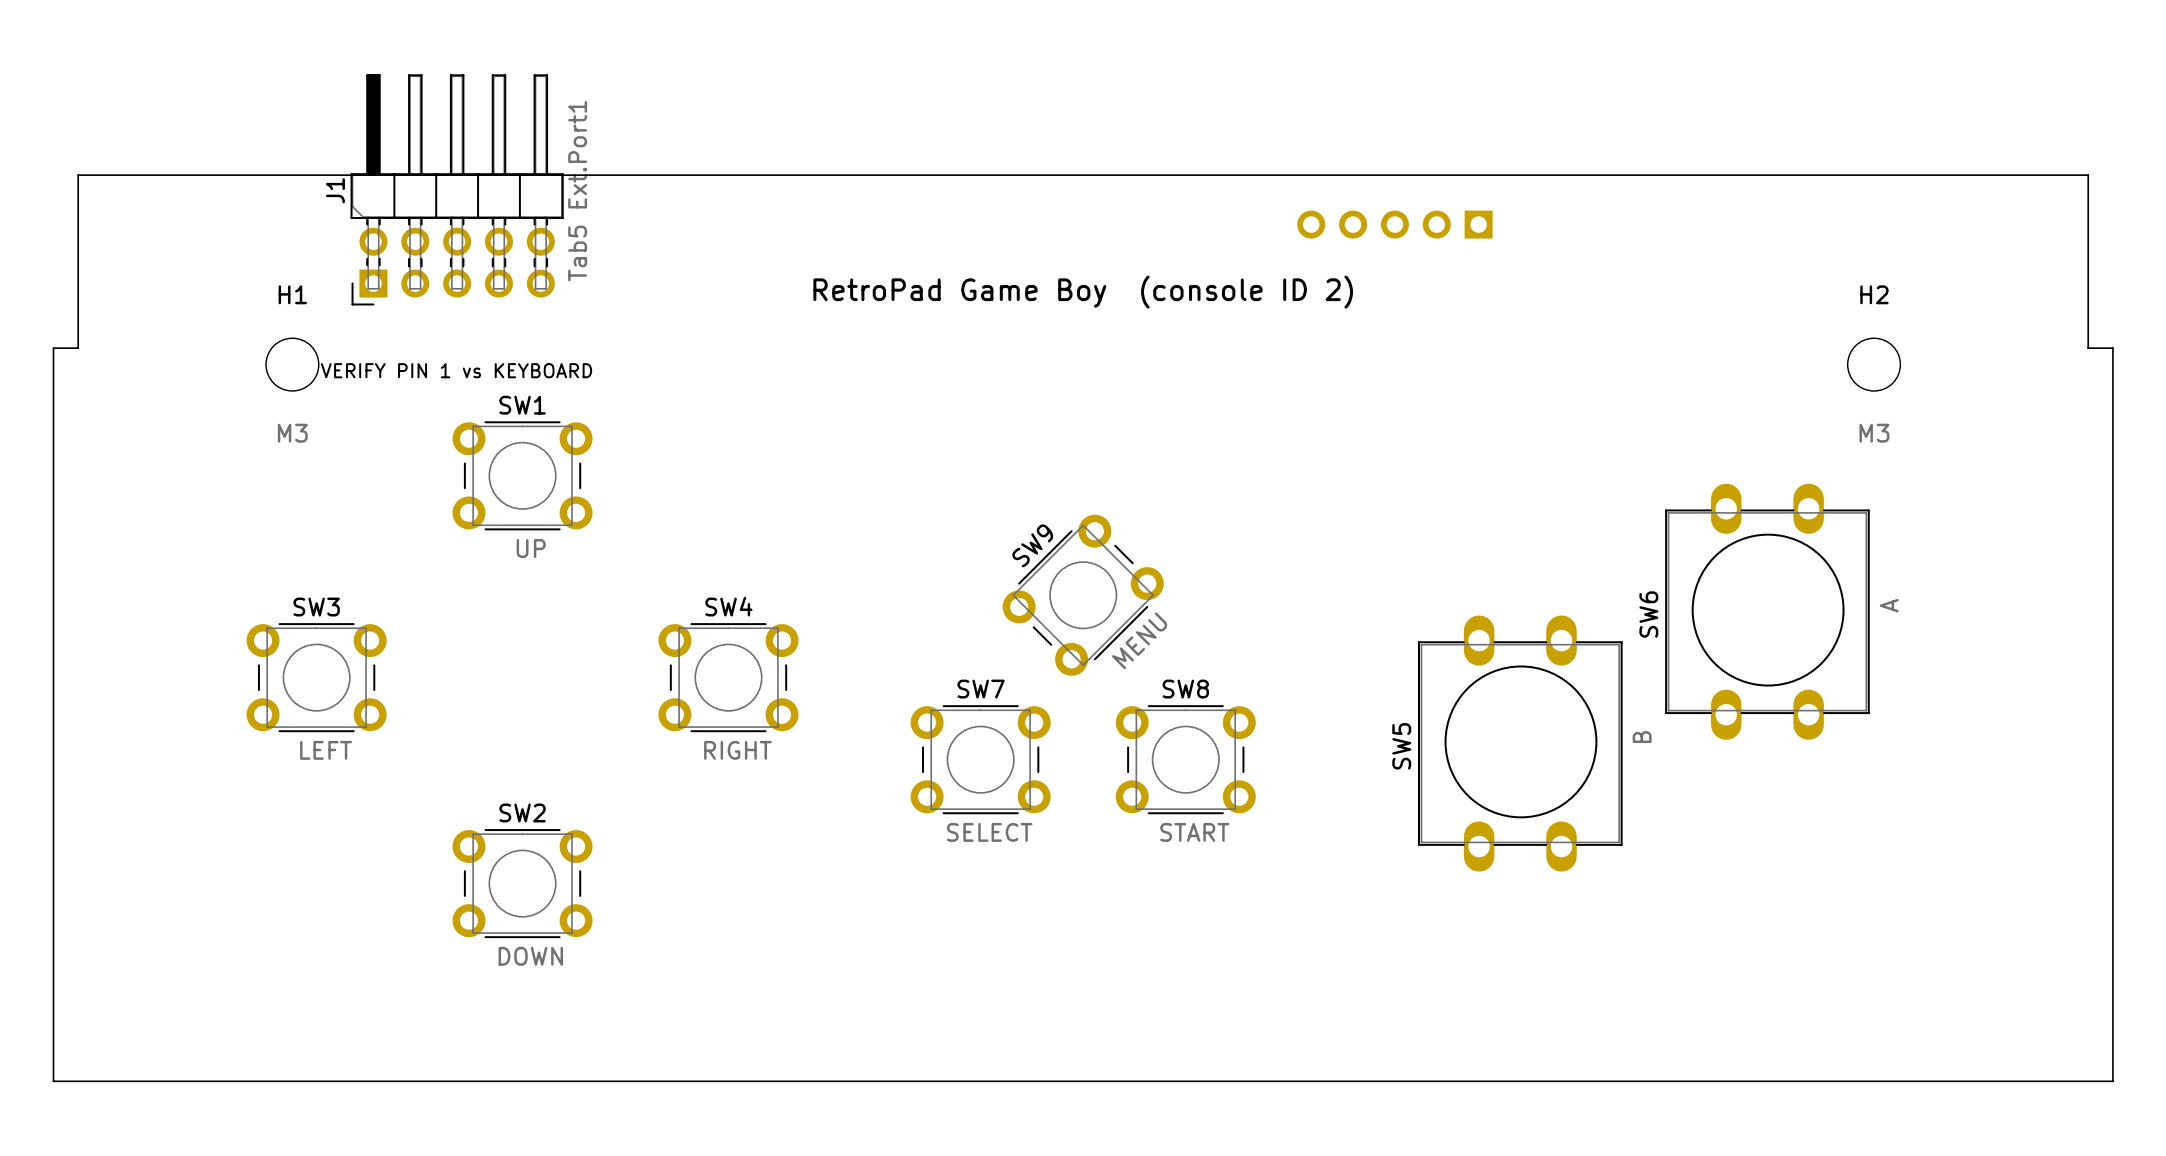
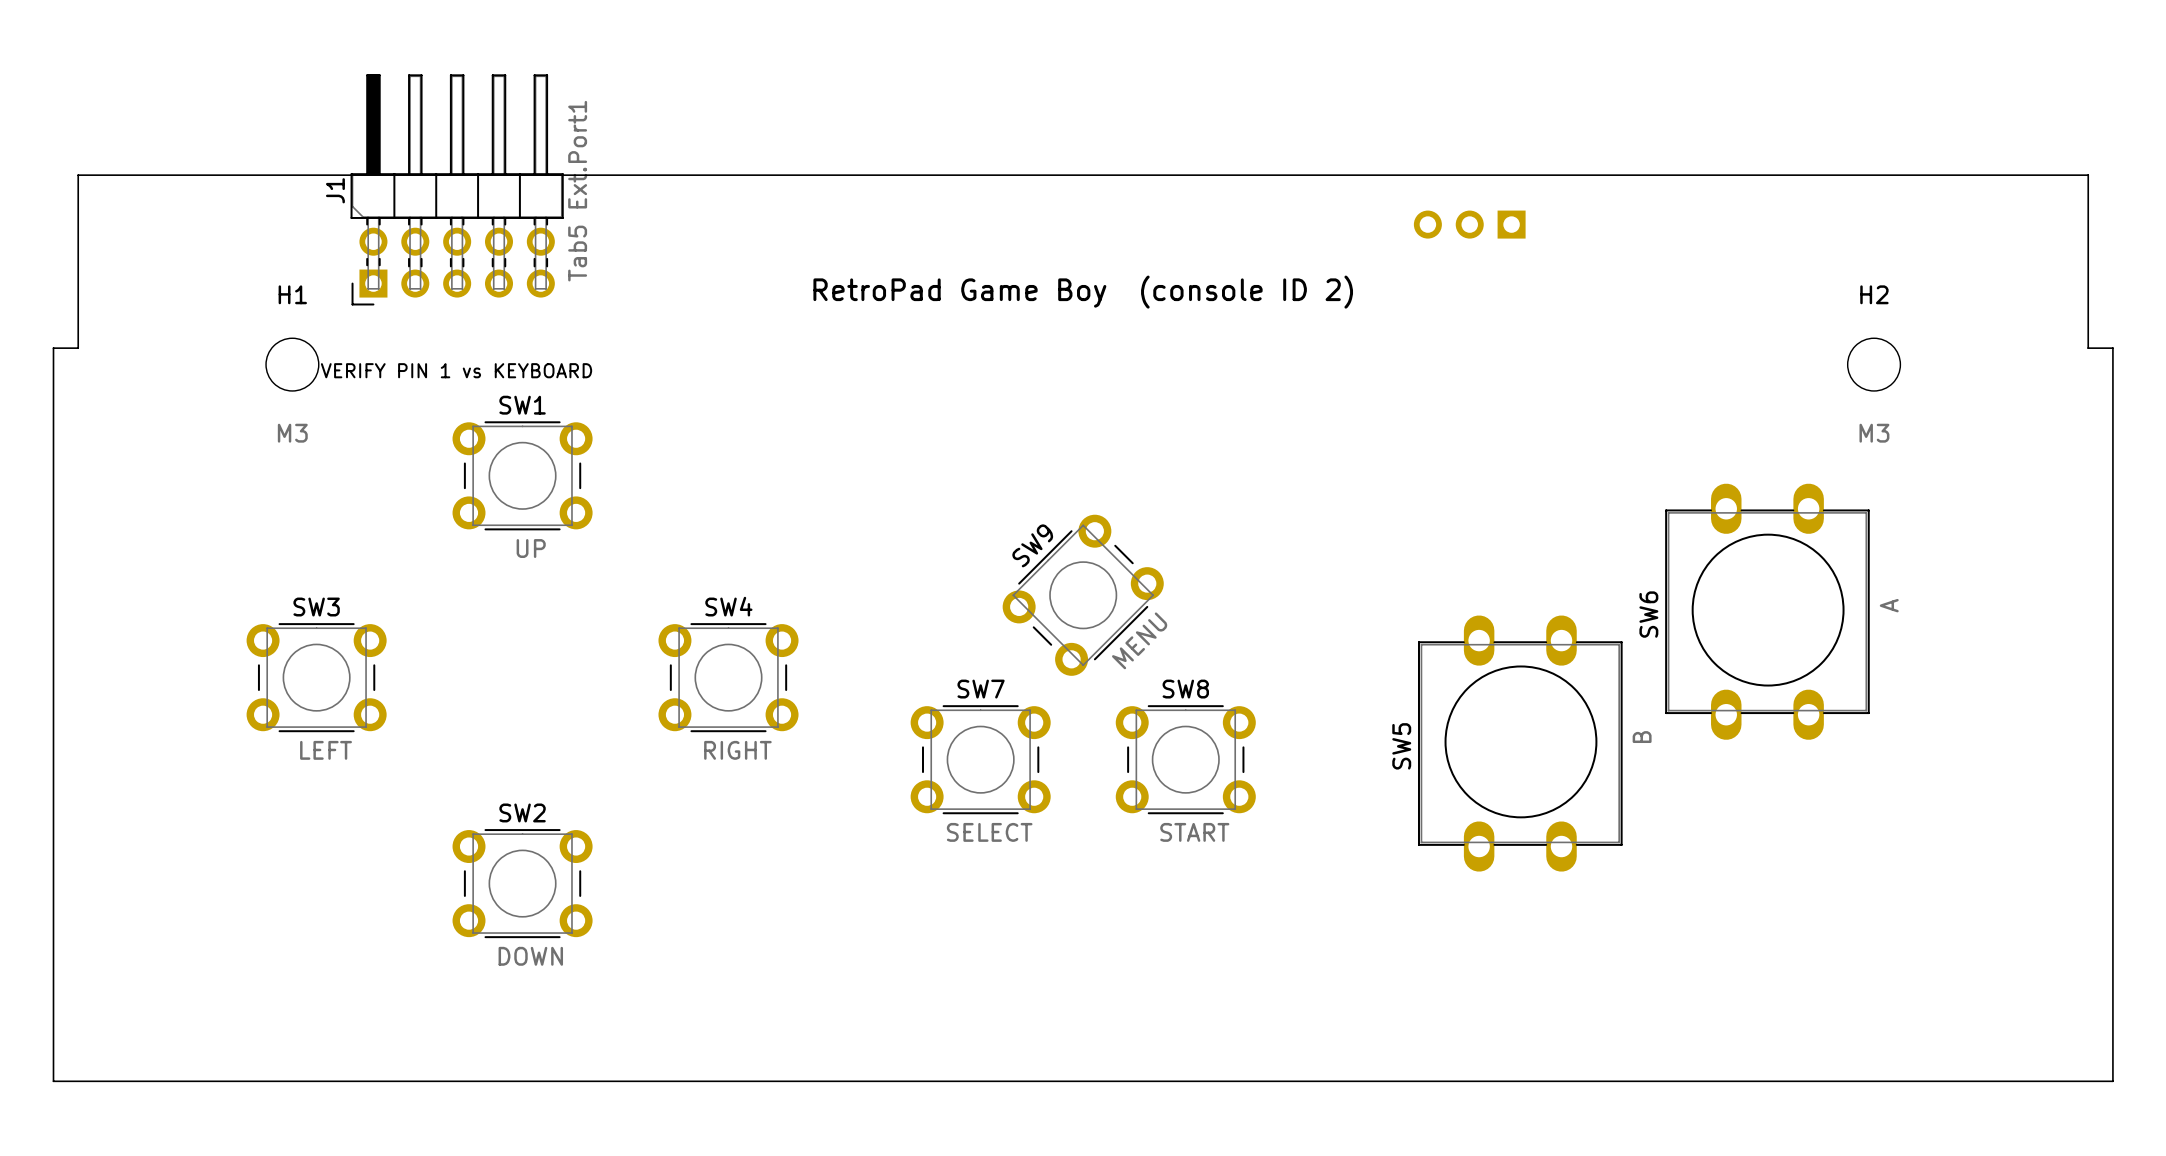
part: (1394, 224) -> none
part: none -> (1469, 224)

